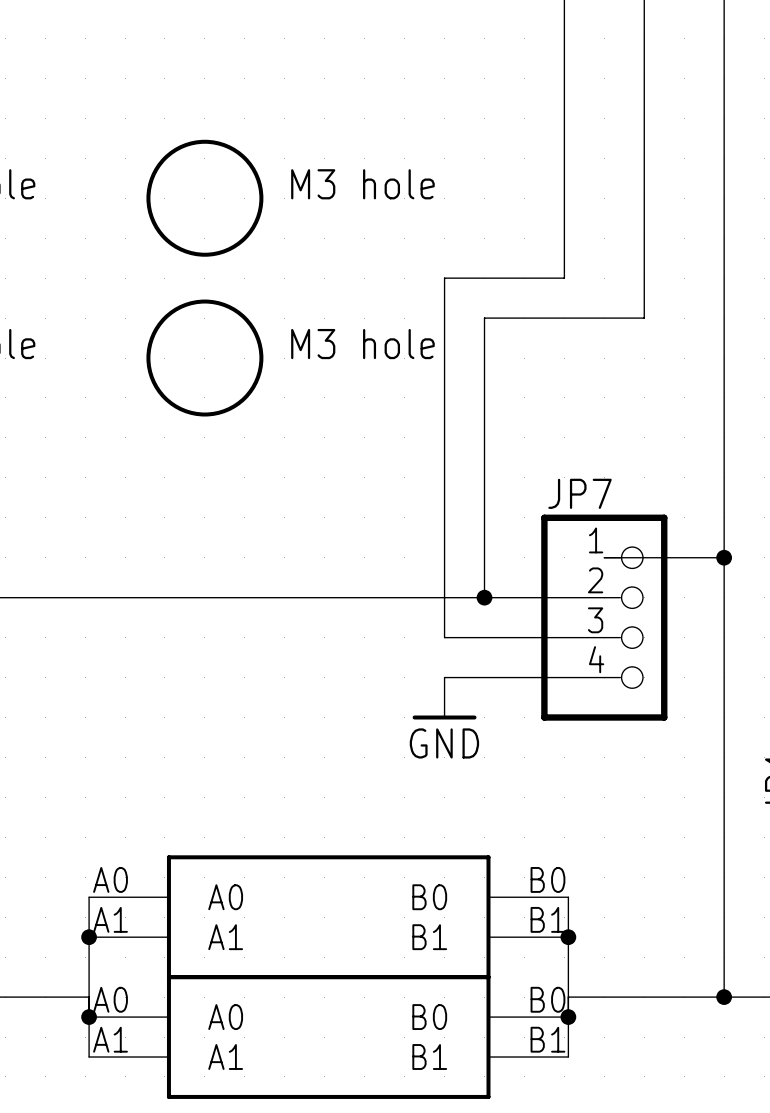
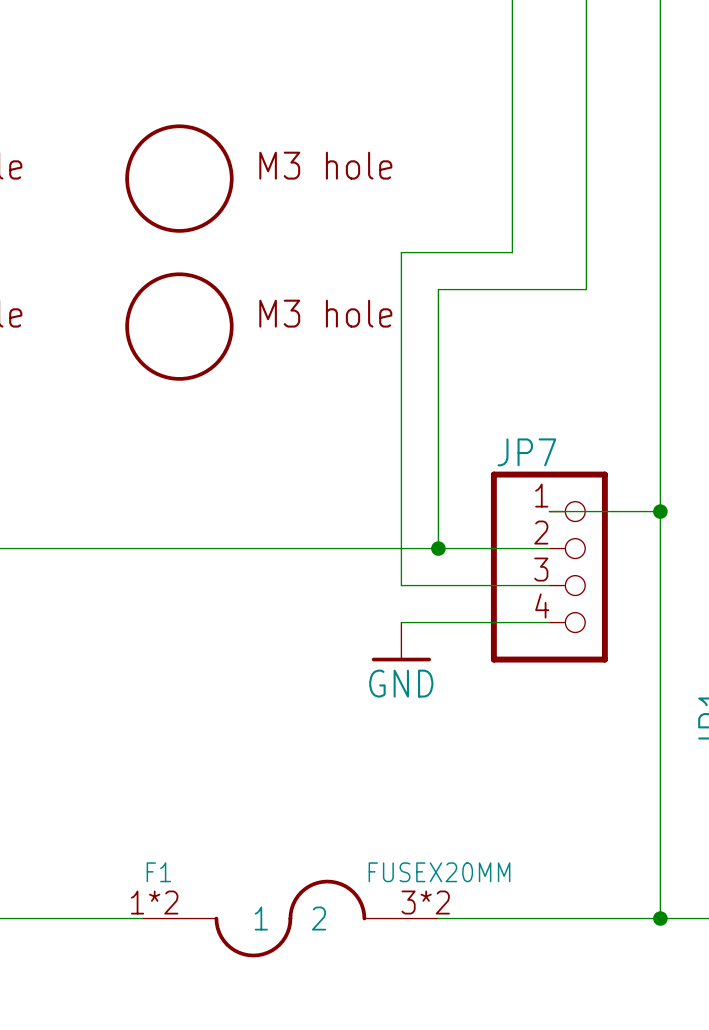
wire: (89, 897) (89, 1057) -> none
wire: (568, 897) (568, 1057) -> none
part: (328, 917) -> none
junction: (89, 937) -> none
junction: (568, 937) -> none
wire: none -> (72, 918) (142, 918)
F1: none -> FUSEX20MM (290, 918)
wire: none -> (438, 918) (516, 918)
junction: (89, 1017) -> none
junction: (568, 1017) -> none
part: (328, 1037) -> none

